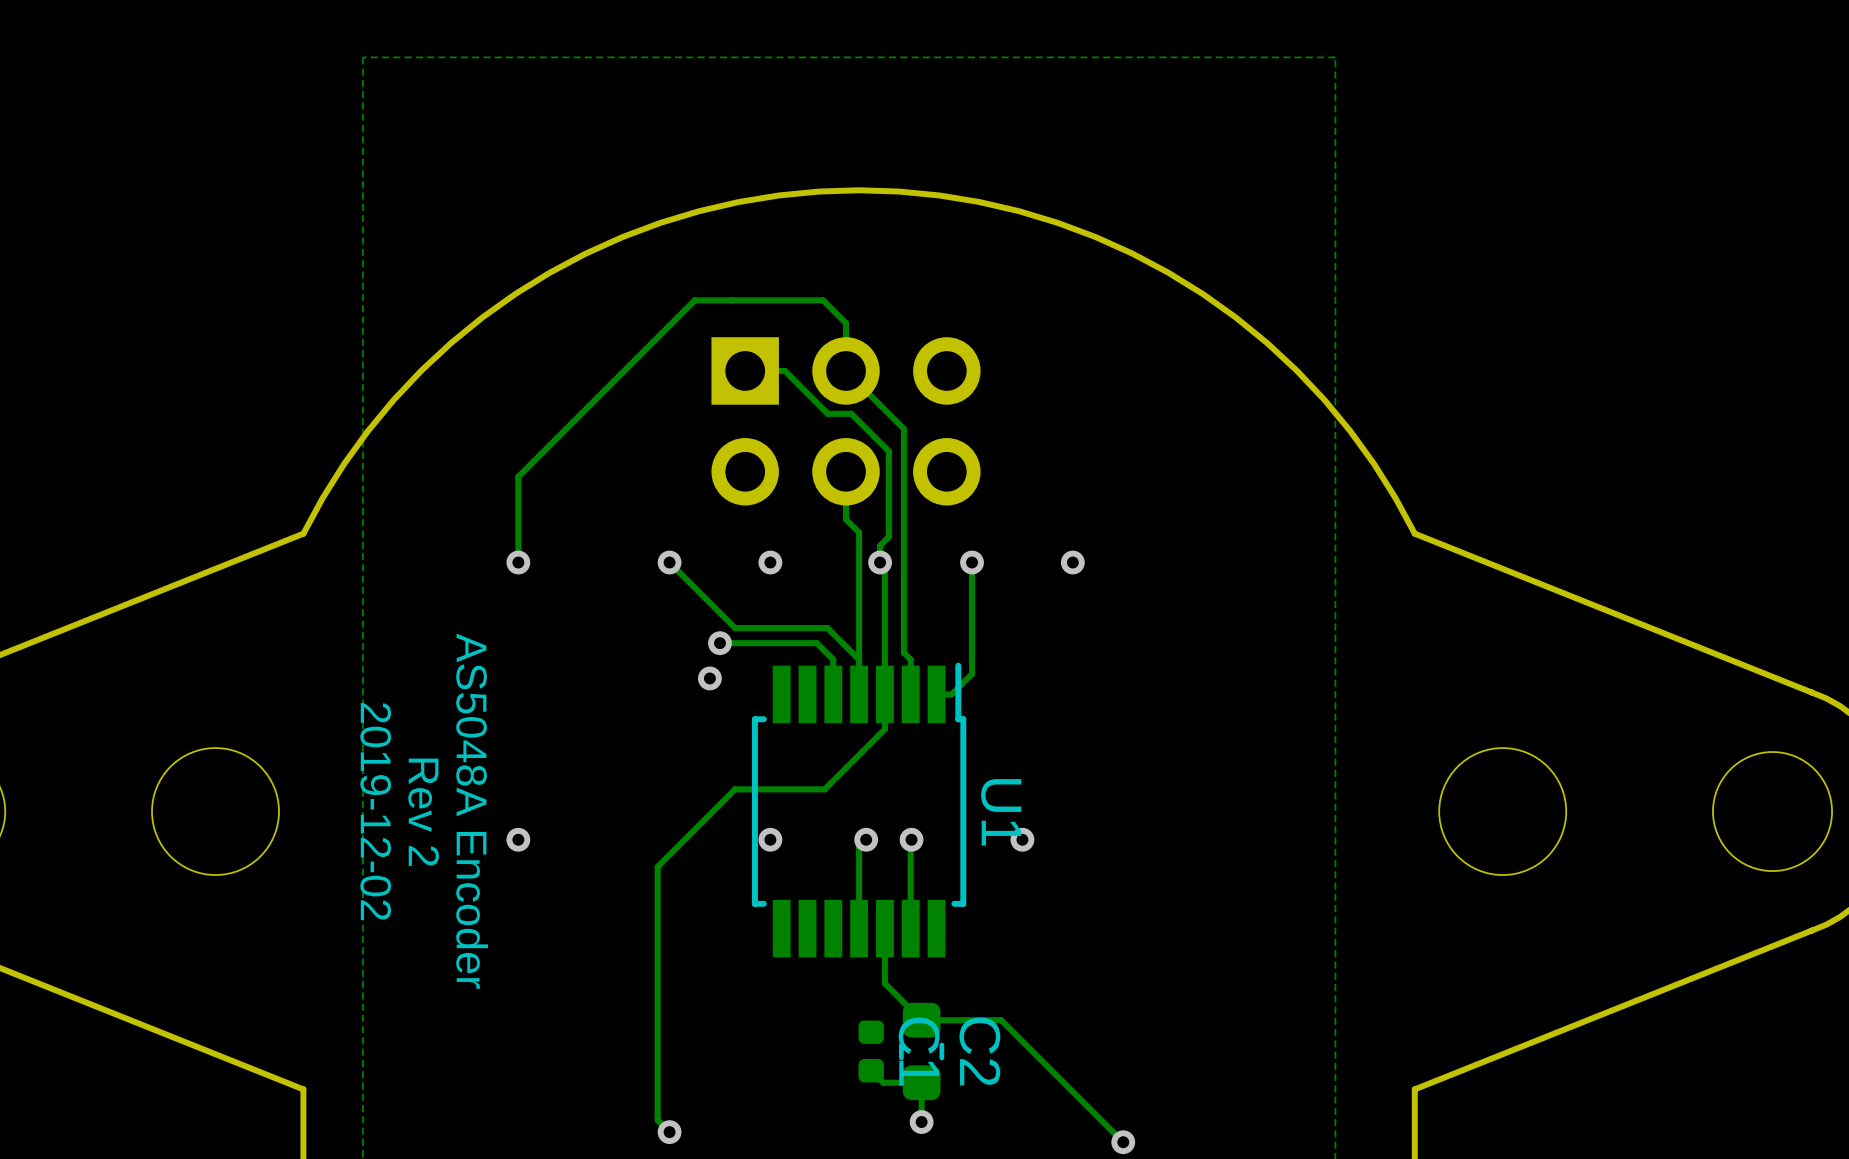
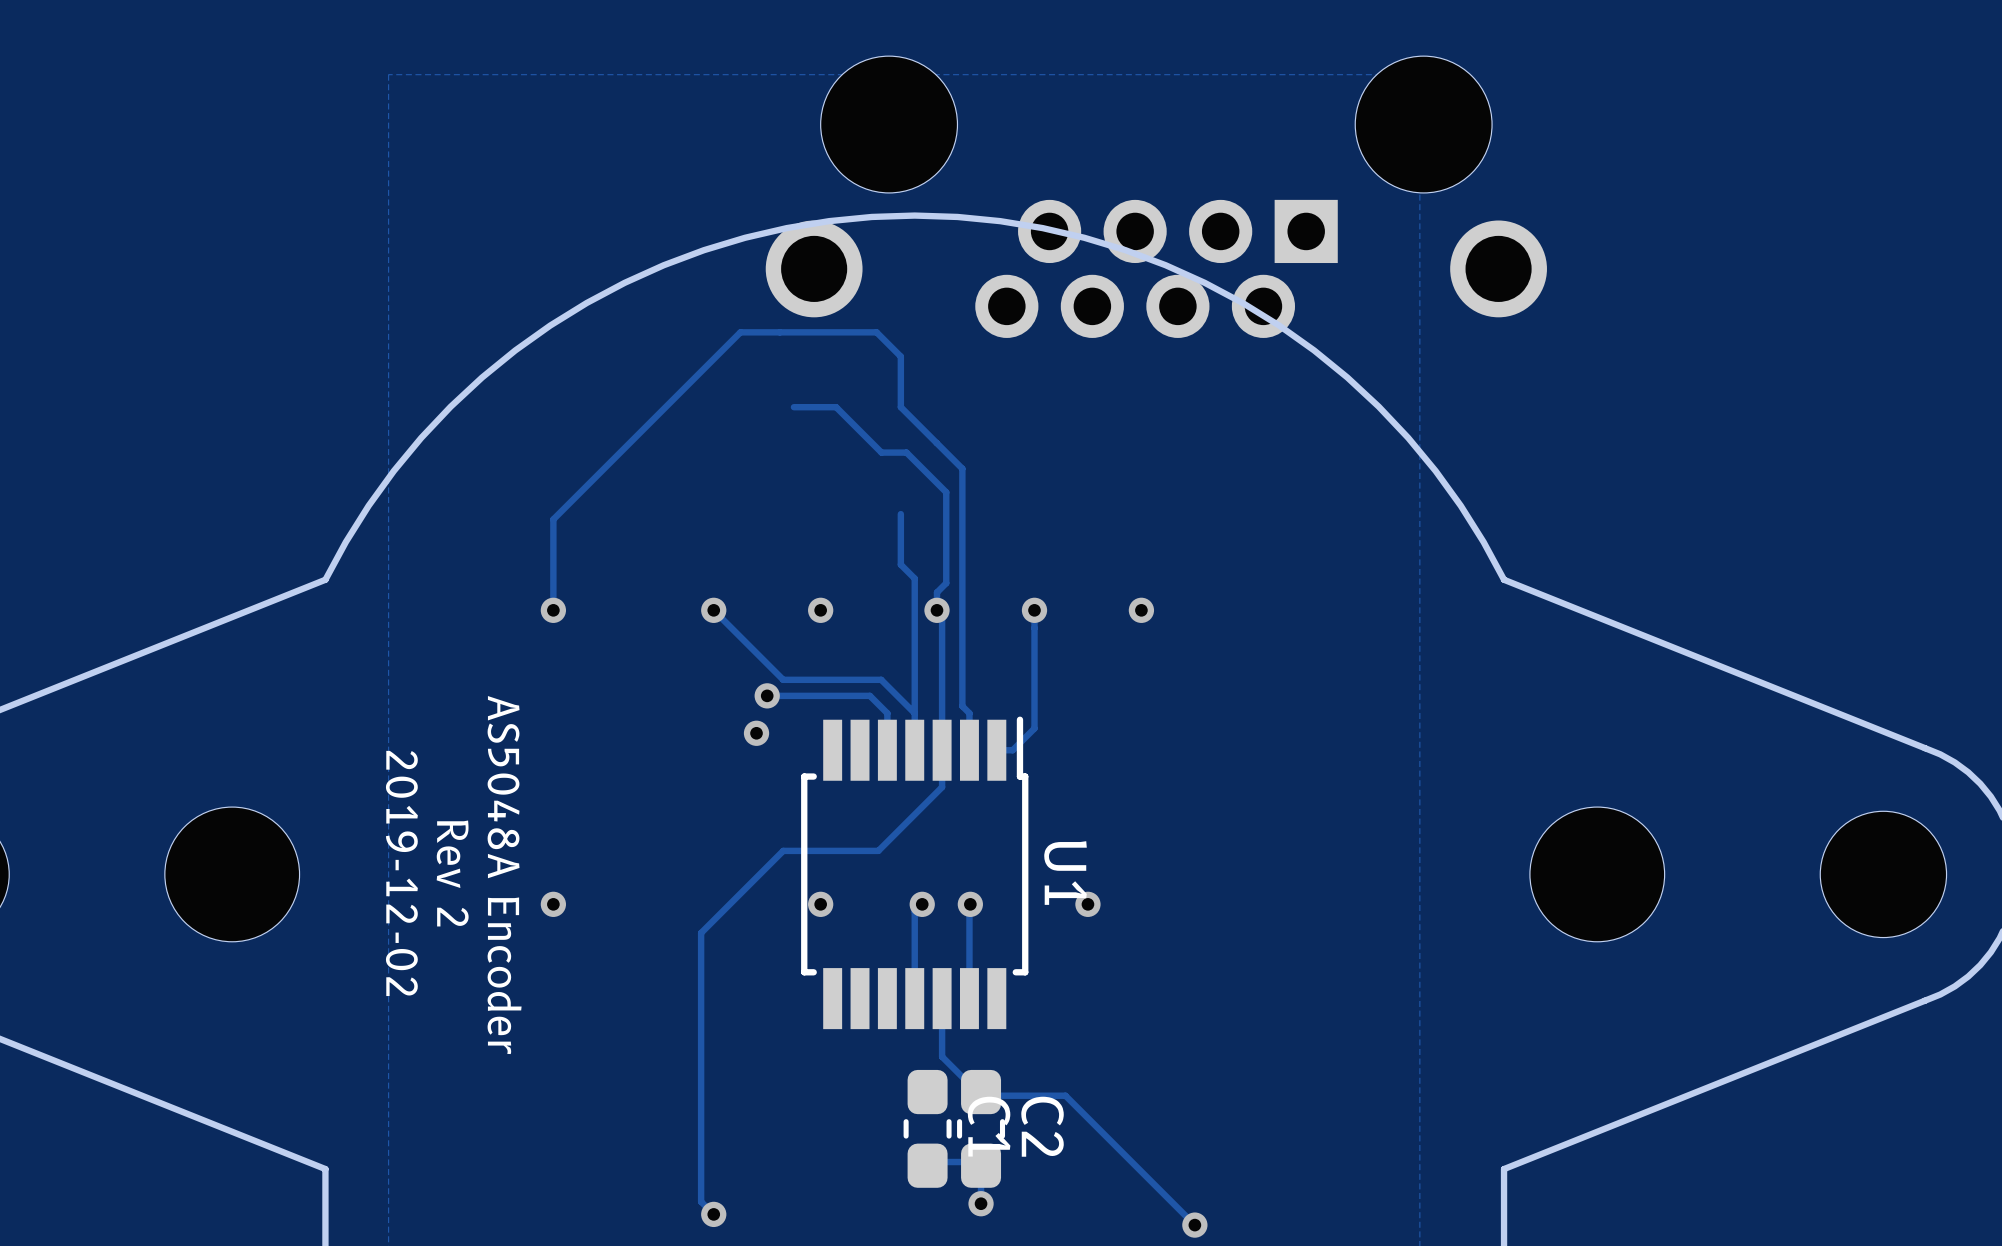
part: none -> (1156, 197)
part: (846, 421) -> none
C2 footprint: [899, 1002, 945, 1101] -> [957, 1069, 1006, 1188]
C1 footprint: [858, 1020, 884, 1083] -> [903, 1069, 952, 1188]

